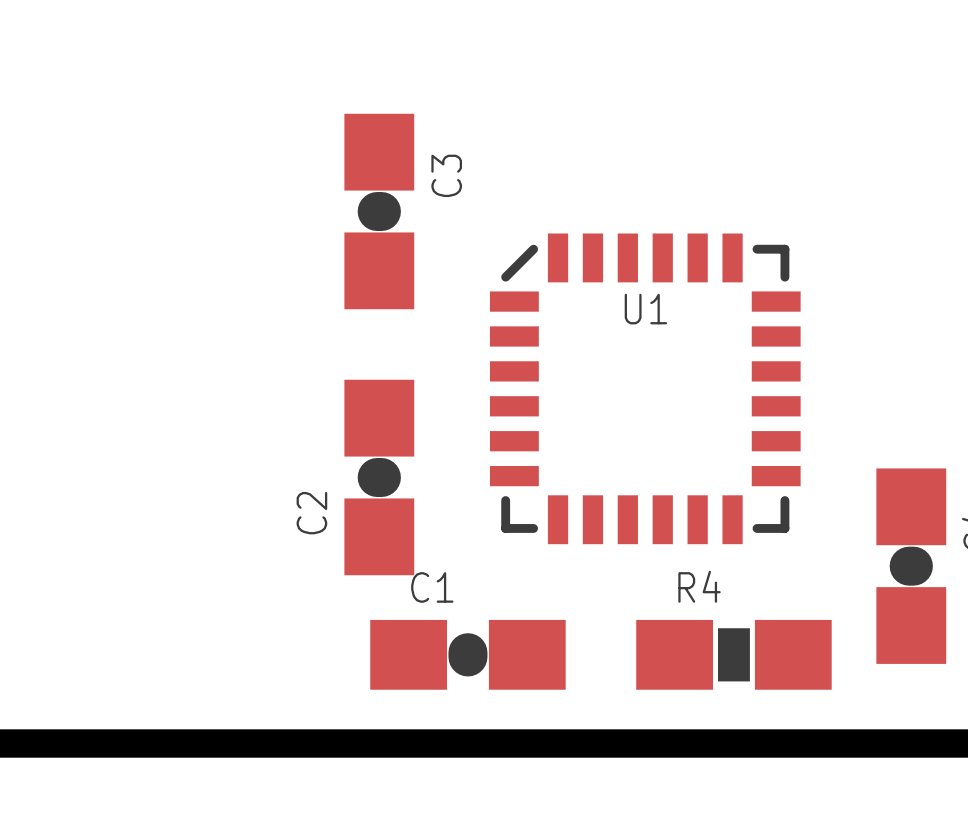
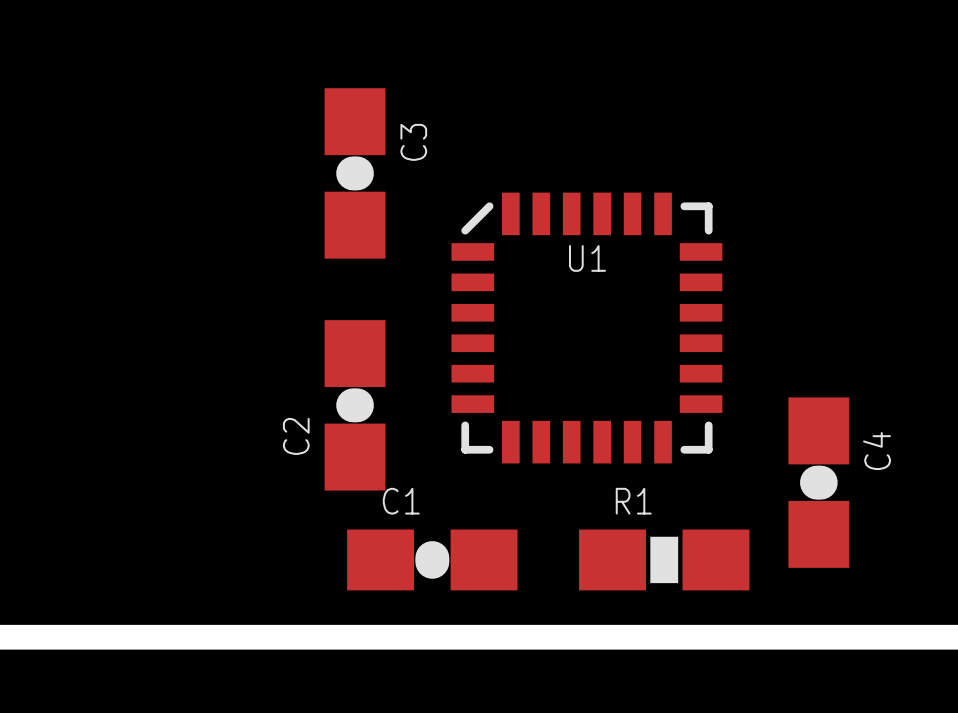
R4 name: R4 (699, 586) -> R1 (633, 501)

